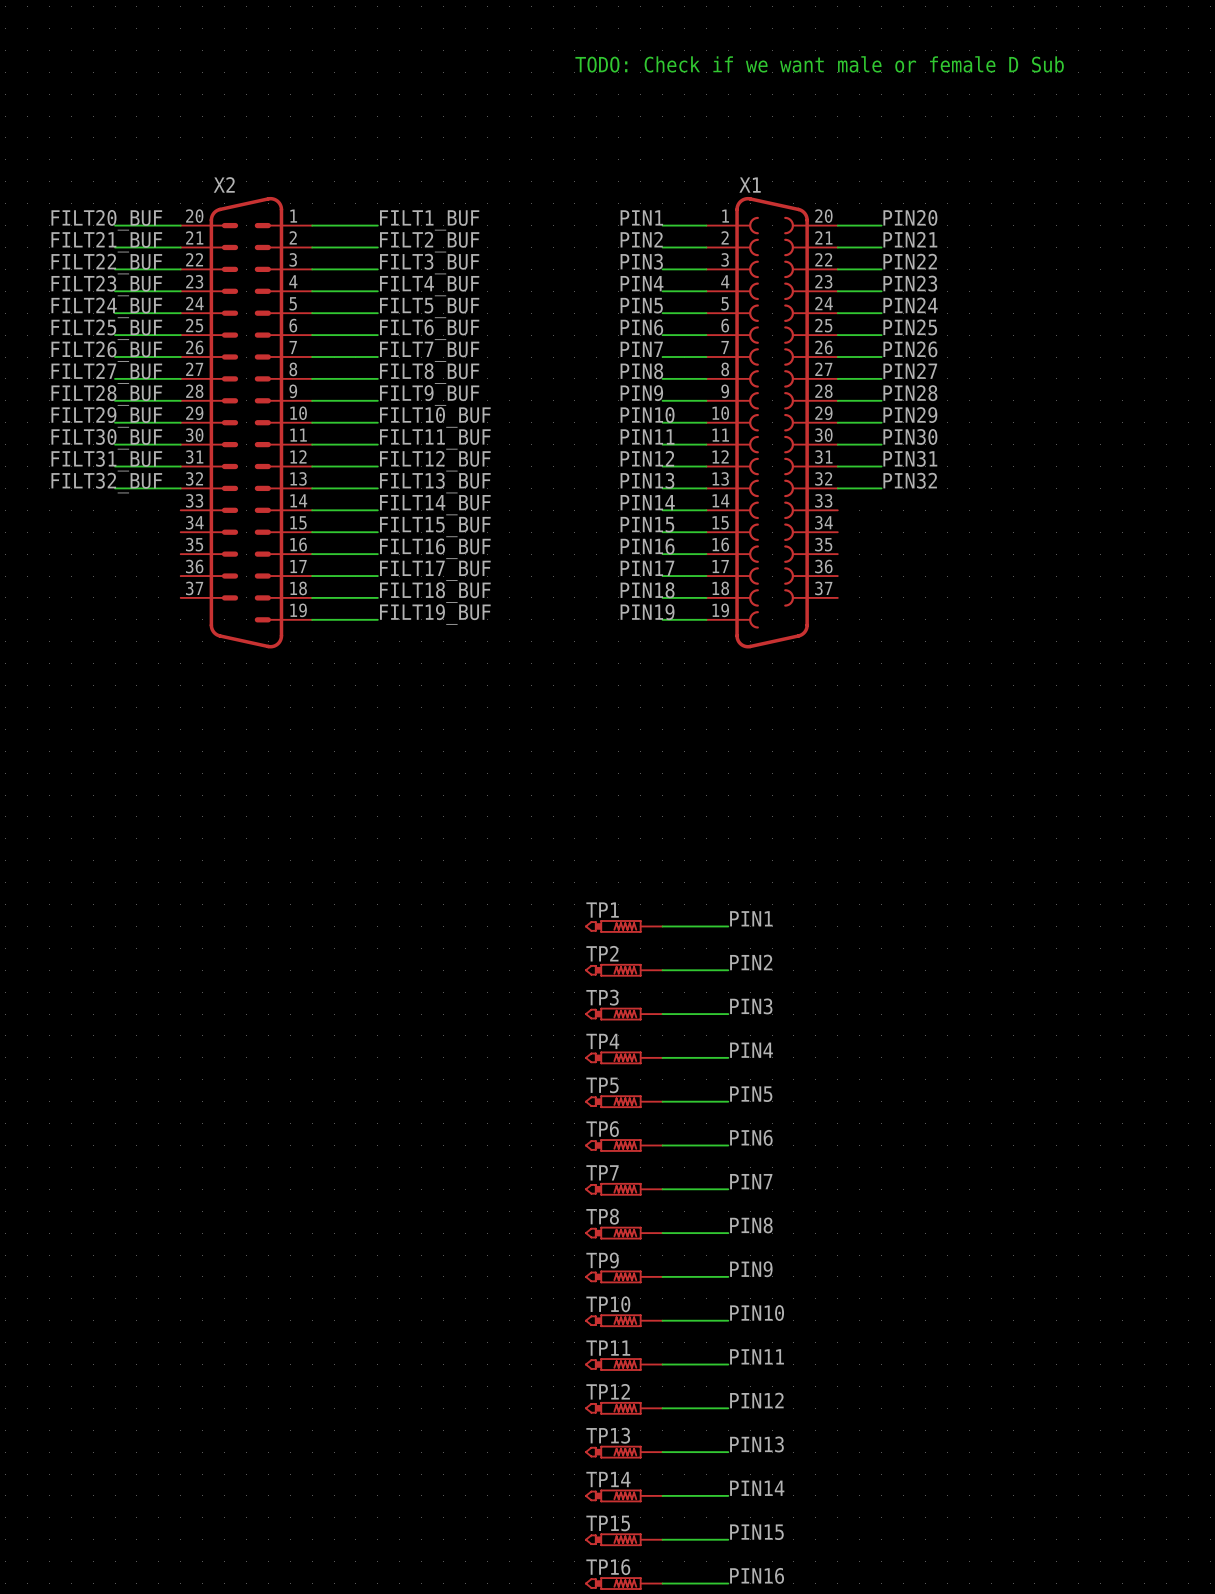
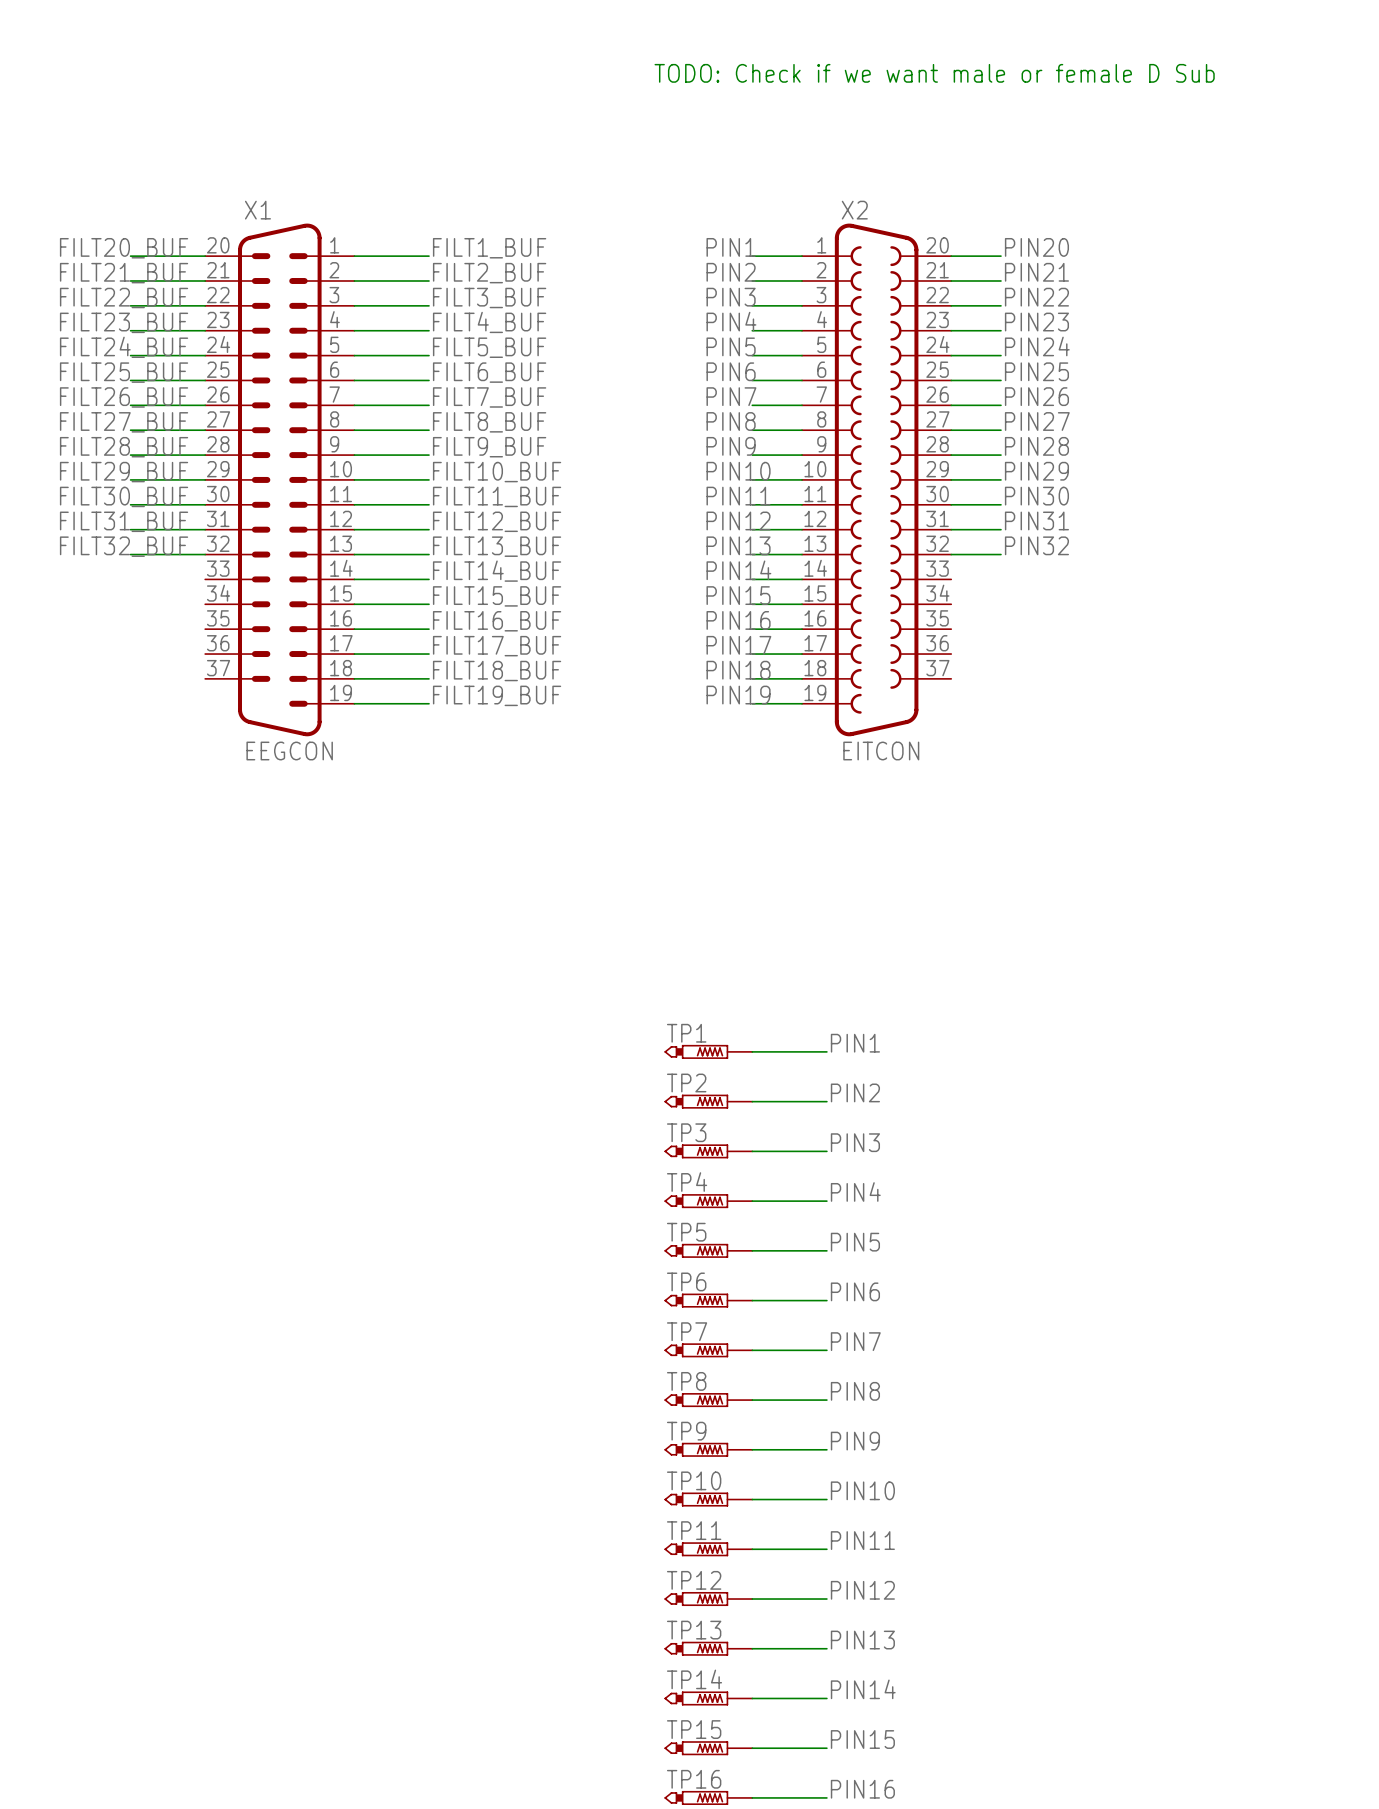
X2 name: X2 (224, 184) -> X1 (257, 210)
X1 name: X1 (750, 185) -> X2 (854, 210)
X2 value: none -> EEGCON (289, 751)
X1 value: none -> EITCON (881, 751)

